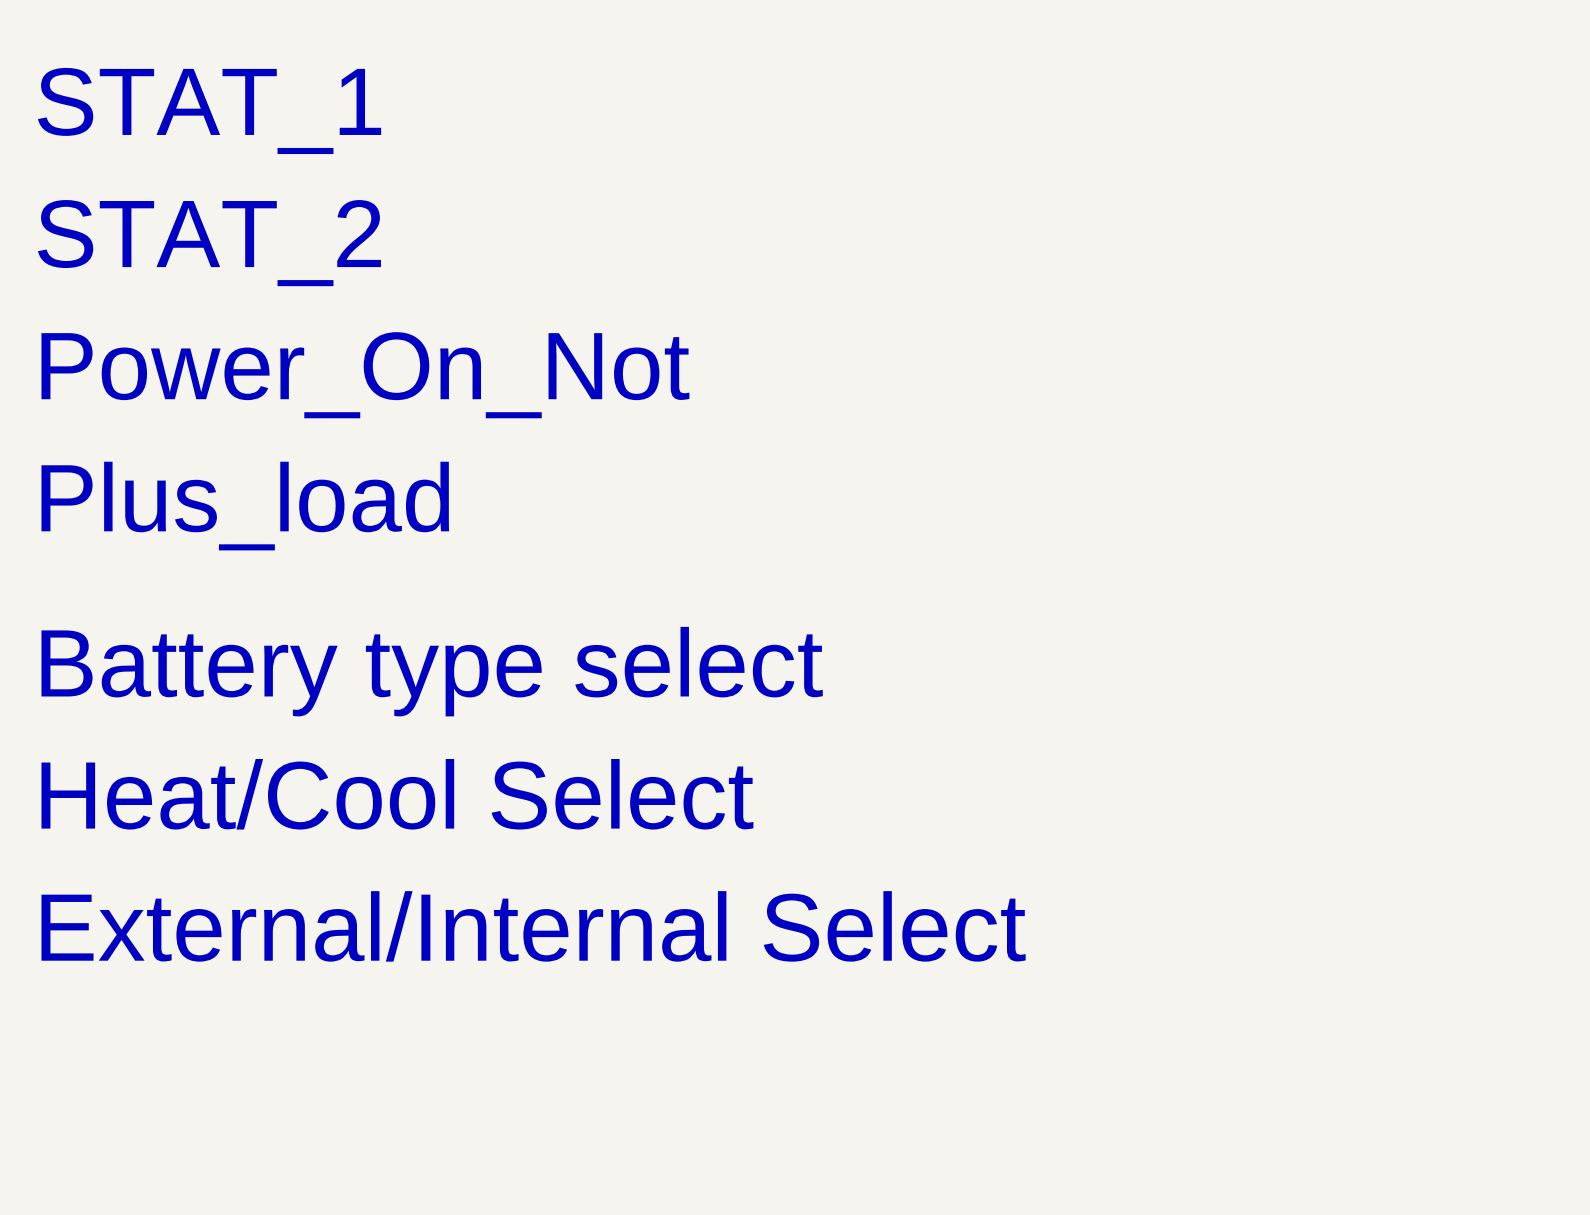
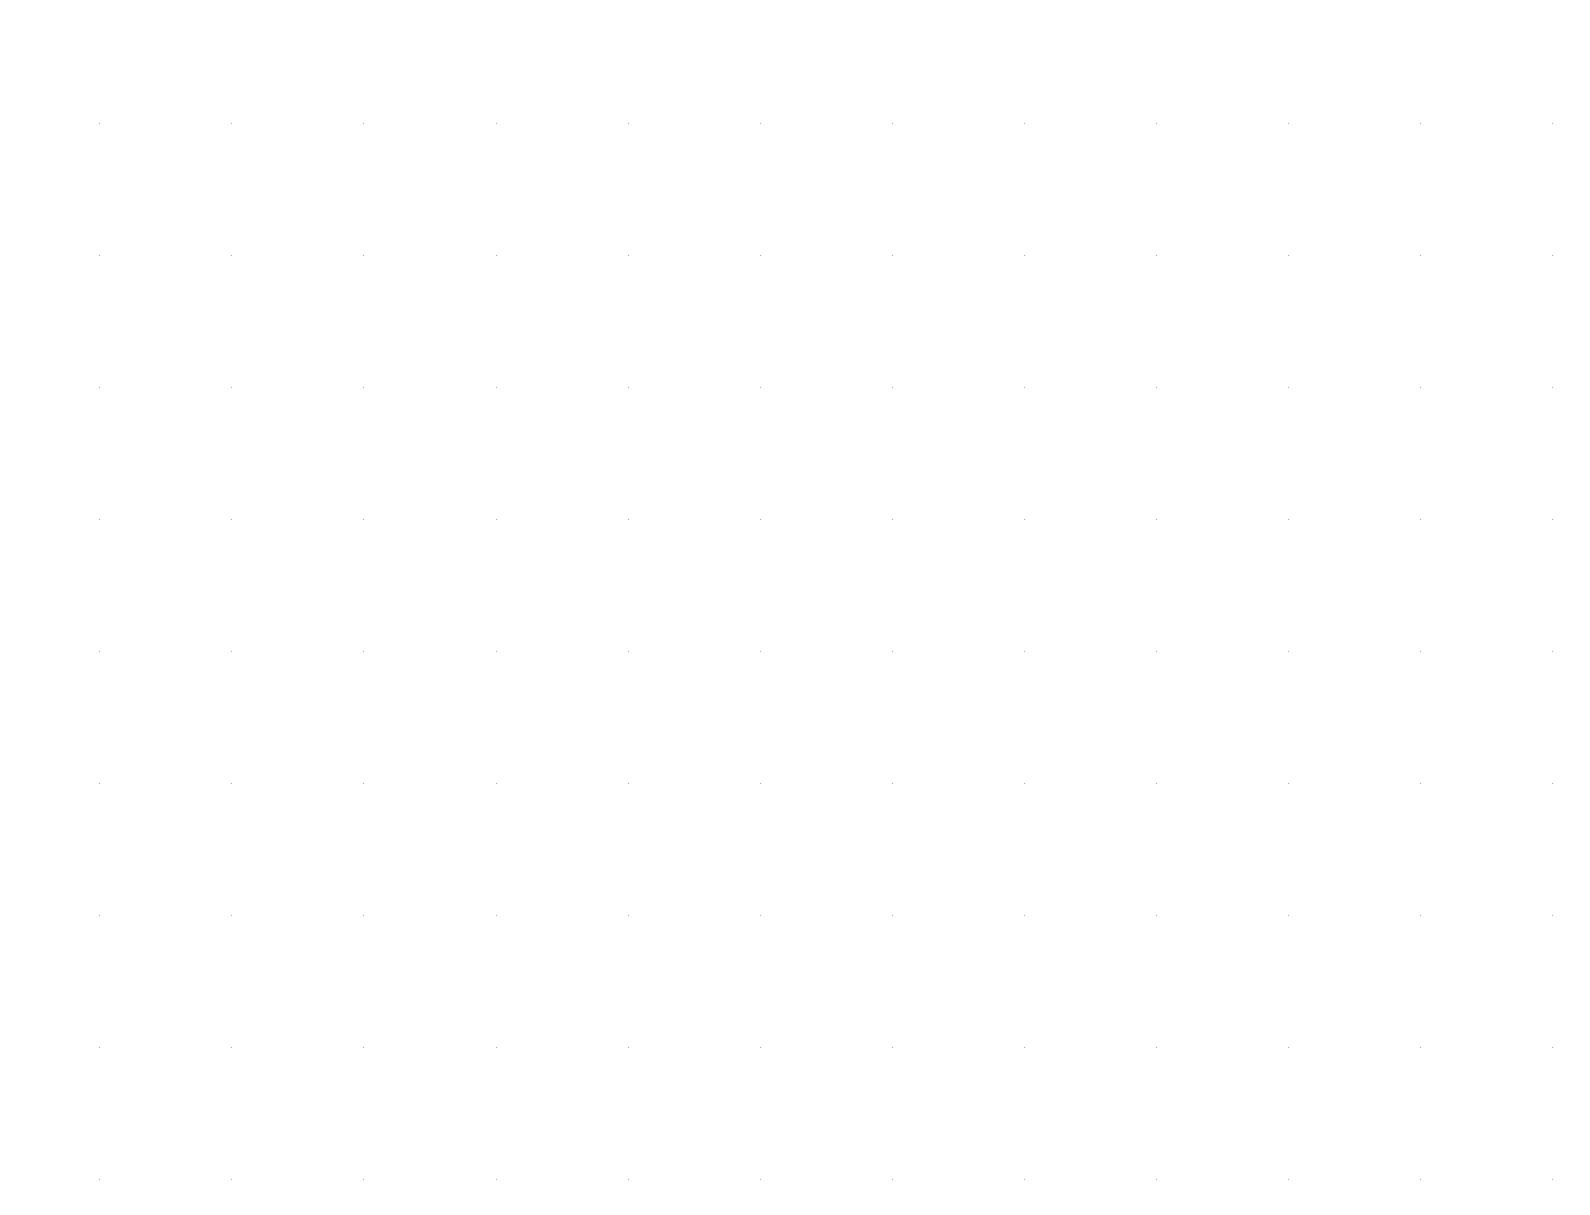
text: STAT_1 (209, 110) -> none
text: STAT_2 (209, 243) -> none
text: Power_On_Not (365, 375) -> none
text: Plus_load (245, 506) -> none
text: Battery type select (432, 671) -> none
text: Heat/Cool Select (397, 794) -> none
text: External/Internal Select (533, 926) -> none

